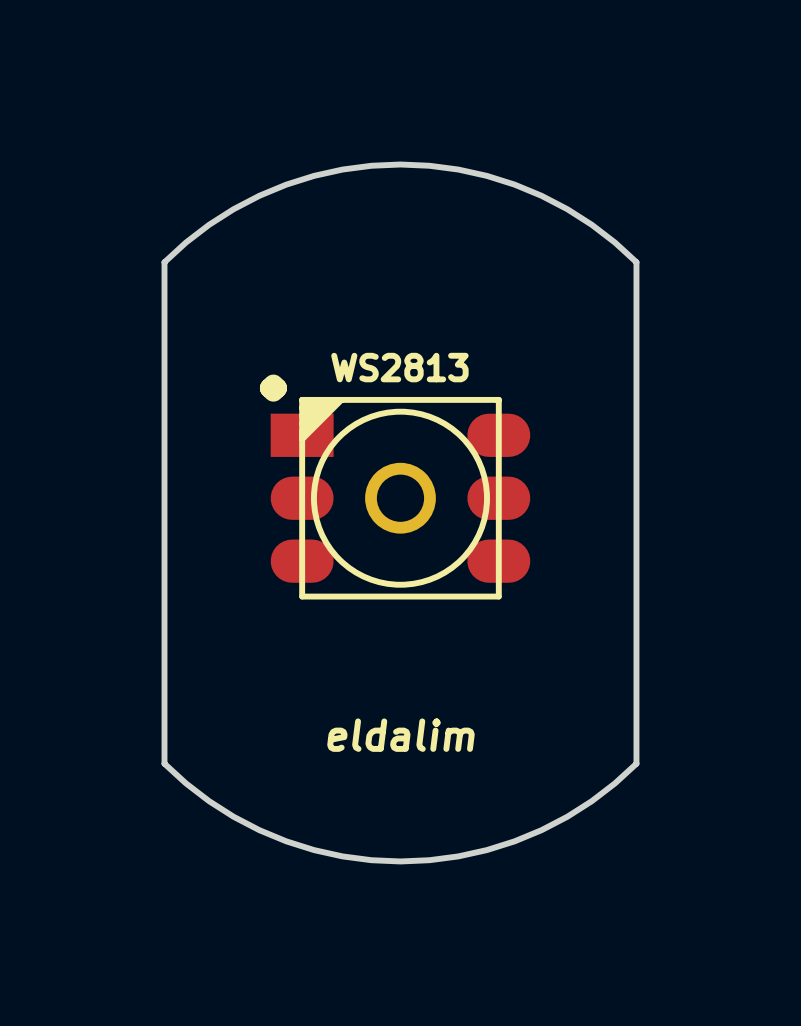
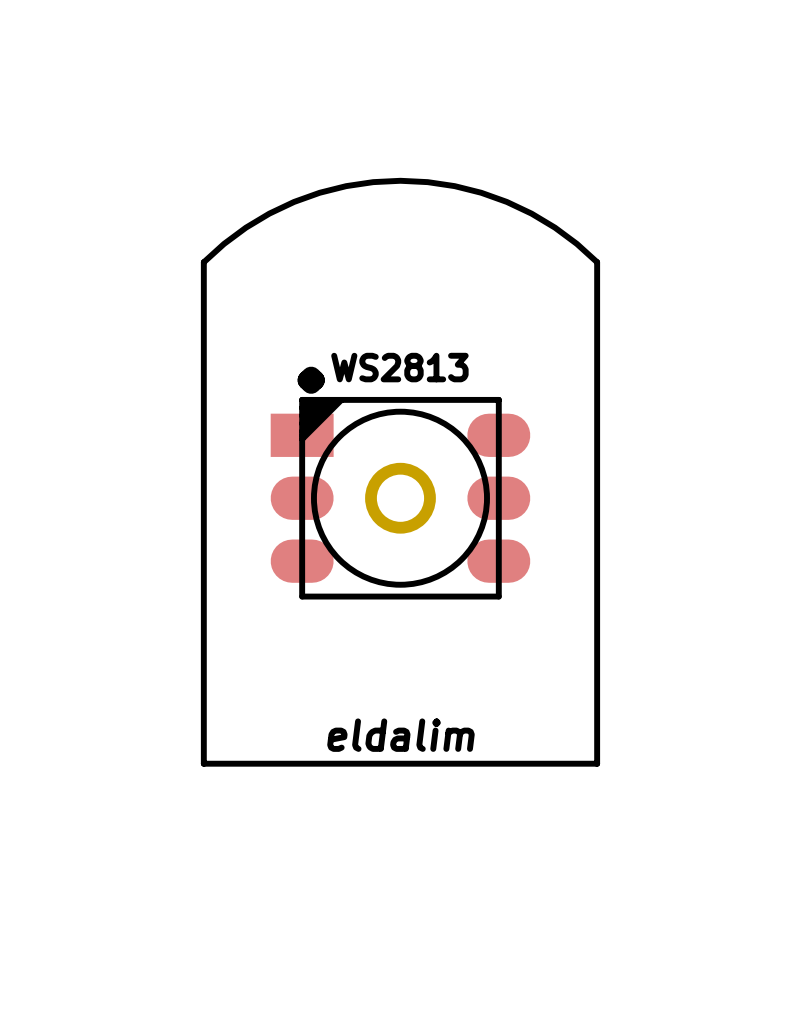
board edge: (164, 262) (164, 763) (209, 801) (259, 830) (314, 850) (371, 860) (429, 860) (458, 856) (514, 841) (567, 816) (615, 783) (636, 763) (636, 262) (615, 242) (567, 209) (514, 184) (458, 169) (400, 164) (342, 169) (286, 184) (233, 209) (185, 242) (164, 262) -> (203, 262) (203, 763) (597, 763) (597, 262) (554, 227) (506, 201) (454, 186) (400, 180) (346, 186) (294, 201) (245, 227) (203, 262)
part text rotation: 0° (273, 388) -> 180° (311, 380)

